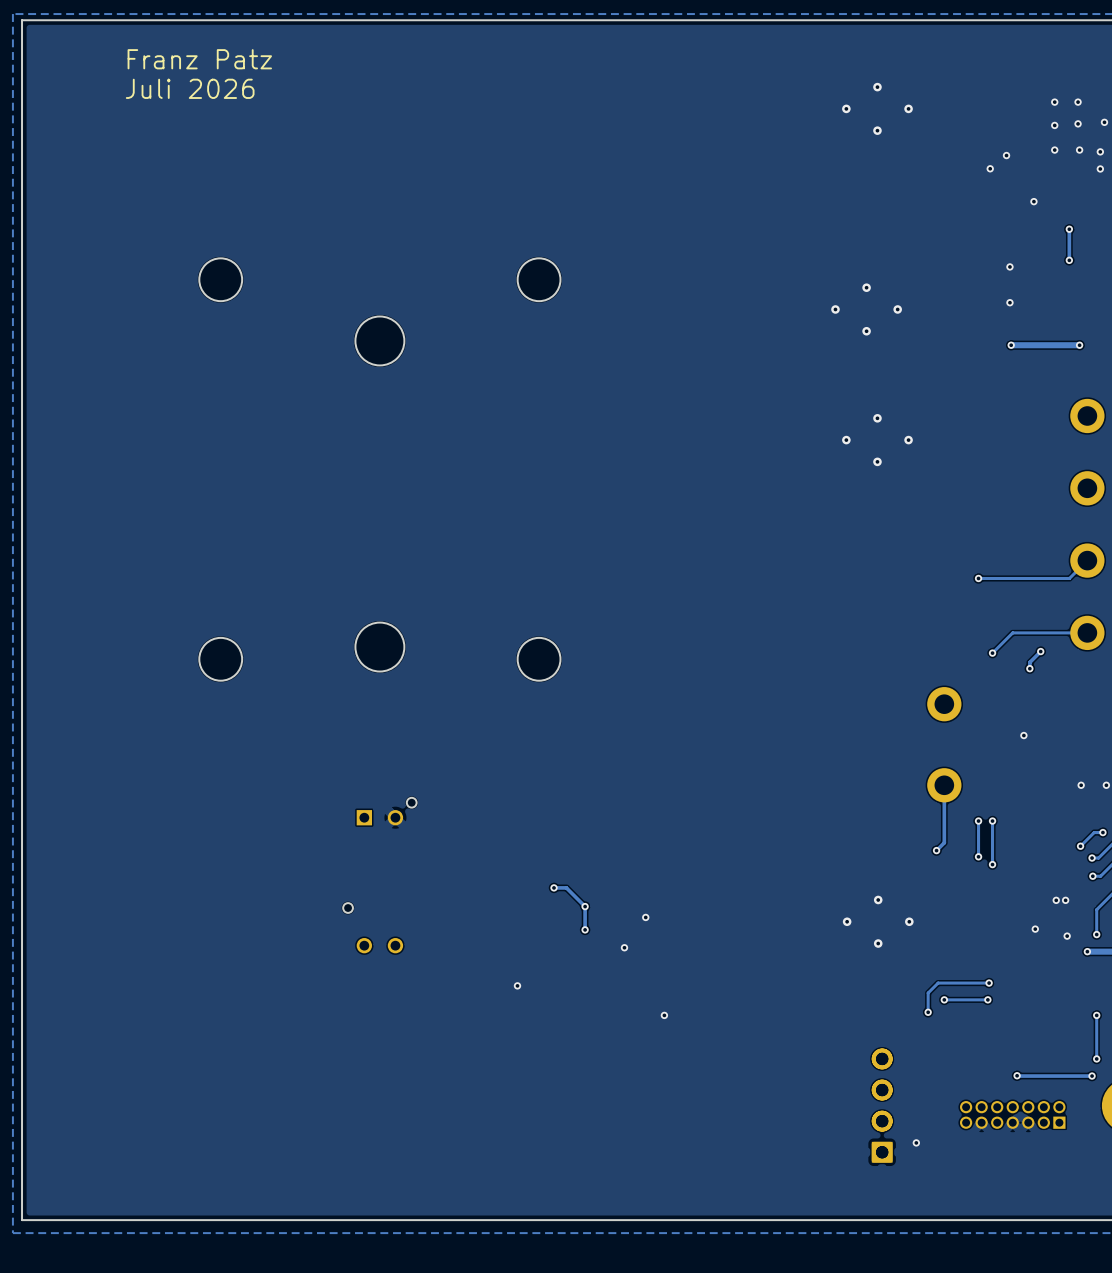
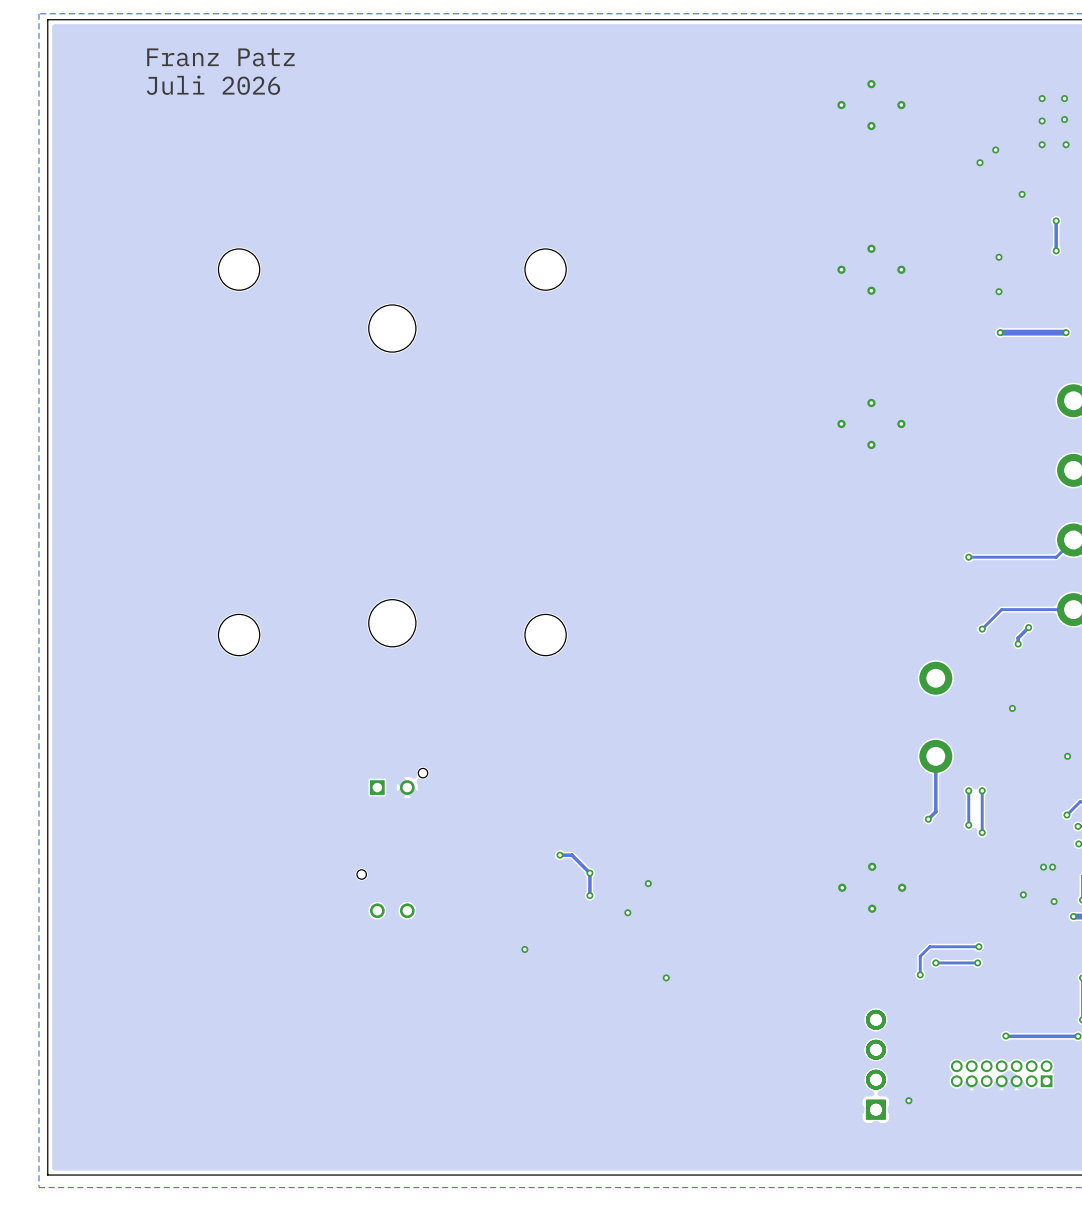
via: none -> (871, 248)
via: none -> (841, 269)
via: none -> (901, 269)
via: (866, 287) -> none
via: none -> (871, 290)
via: (835, 309) -> none
via: (897, 309) -> none
via: (866, 331) -> none

